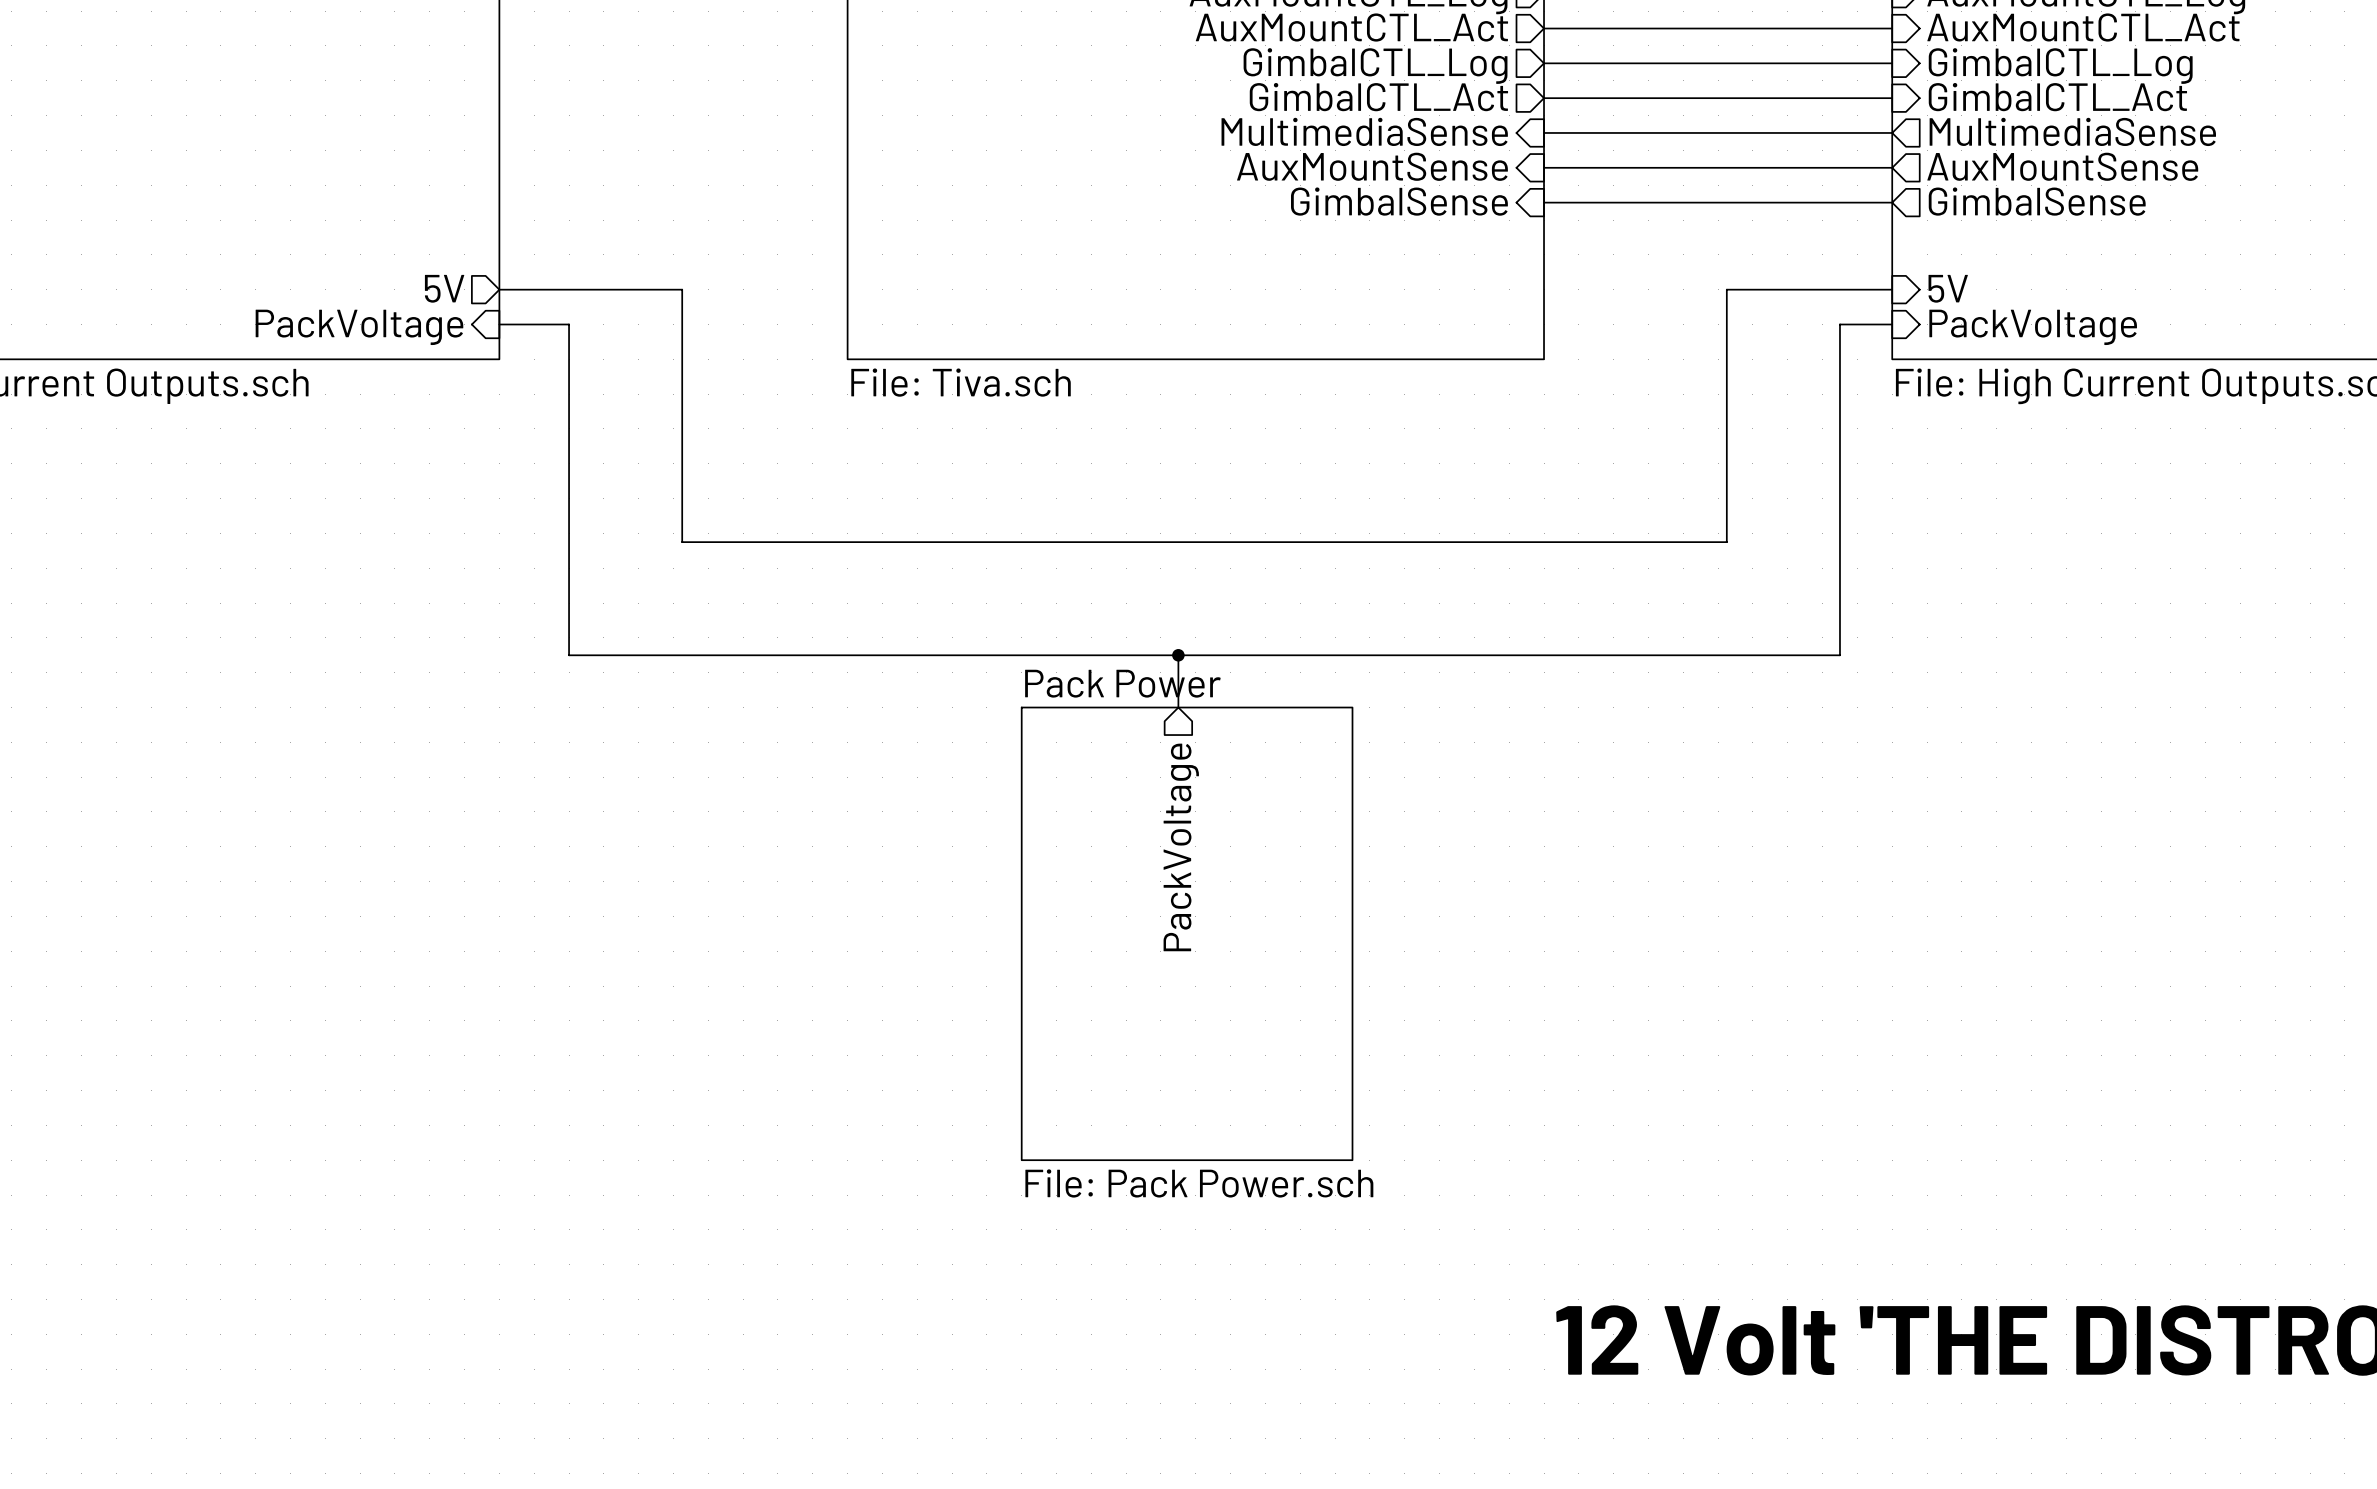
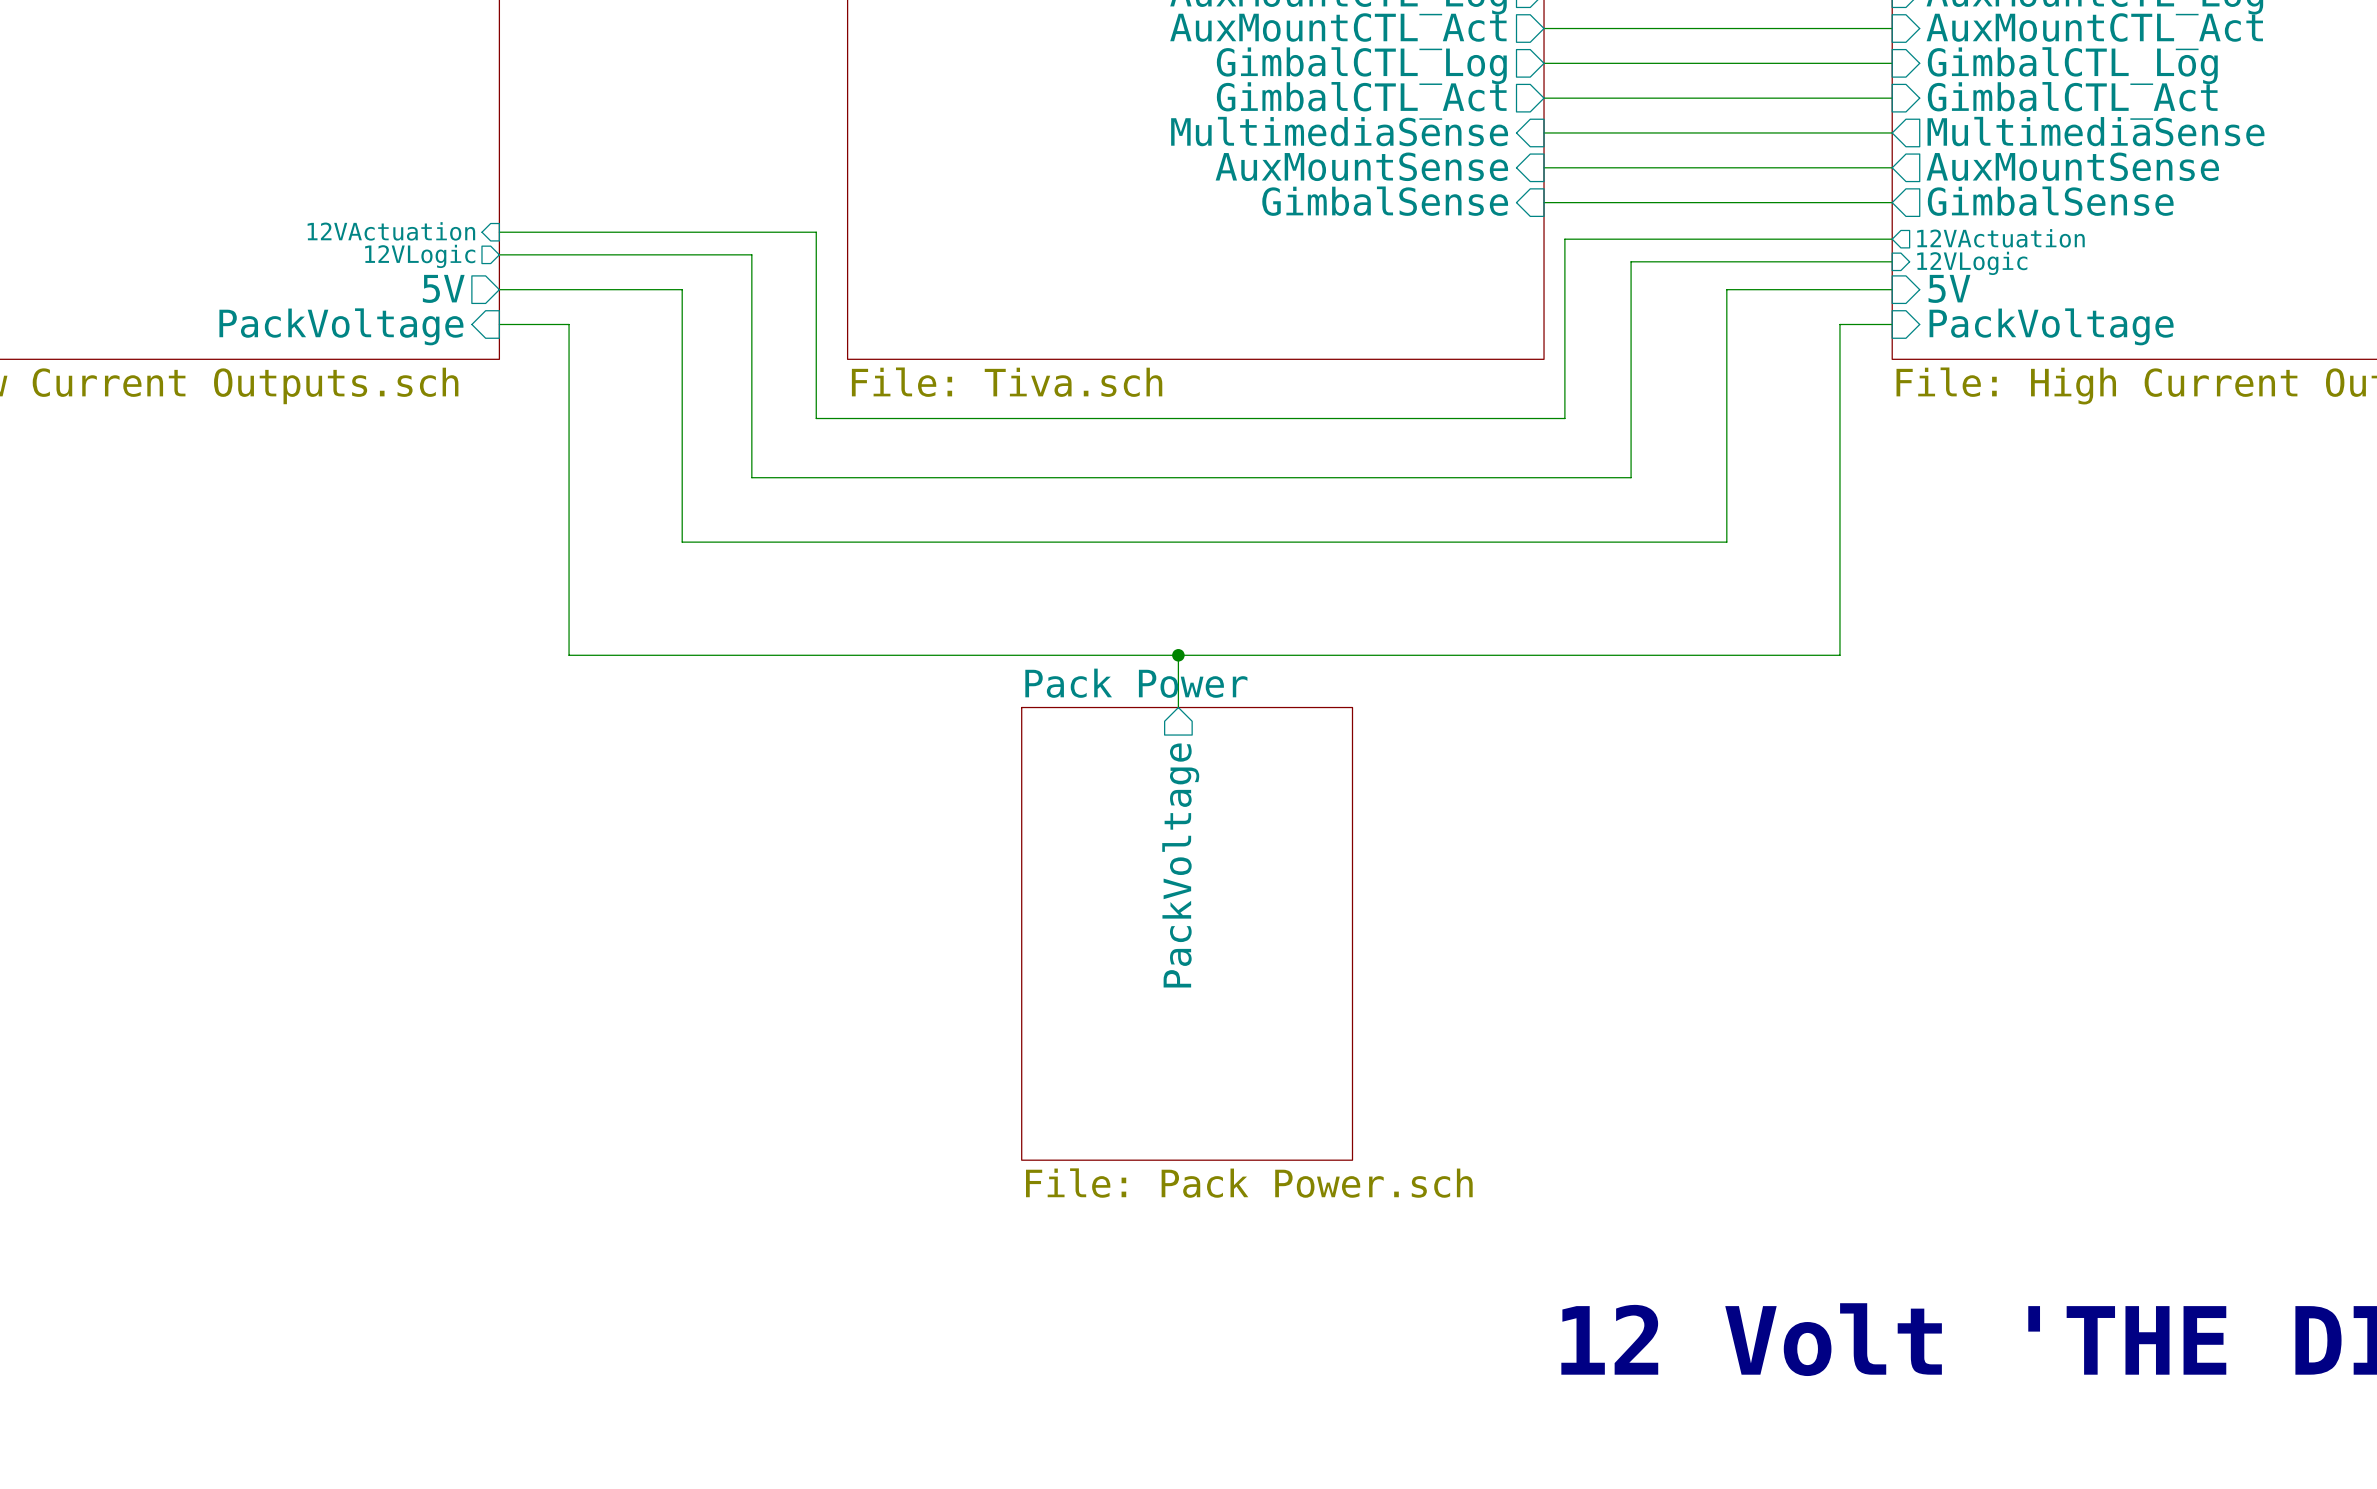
sheet pin: none -> 12VActuation (391, 231)
wire: none -> (499, 232) (816, 232) (816, 418) (1564, 418) (1564, 239) (1892, 239)
sheet pin: none -> 12VActuation (2000, 238)
wire: none -> (499, 254) (751, 254) (751, 477) (1631, 477) (1631, 261) (1892, 261)
sheet pin: none -> 12VLogic (420, 256)
sheet pin: none -> 12VLogic (1972, 263)

